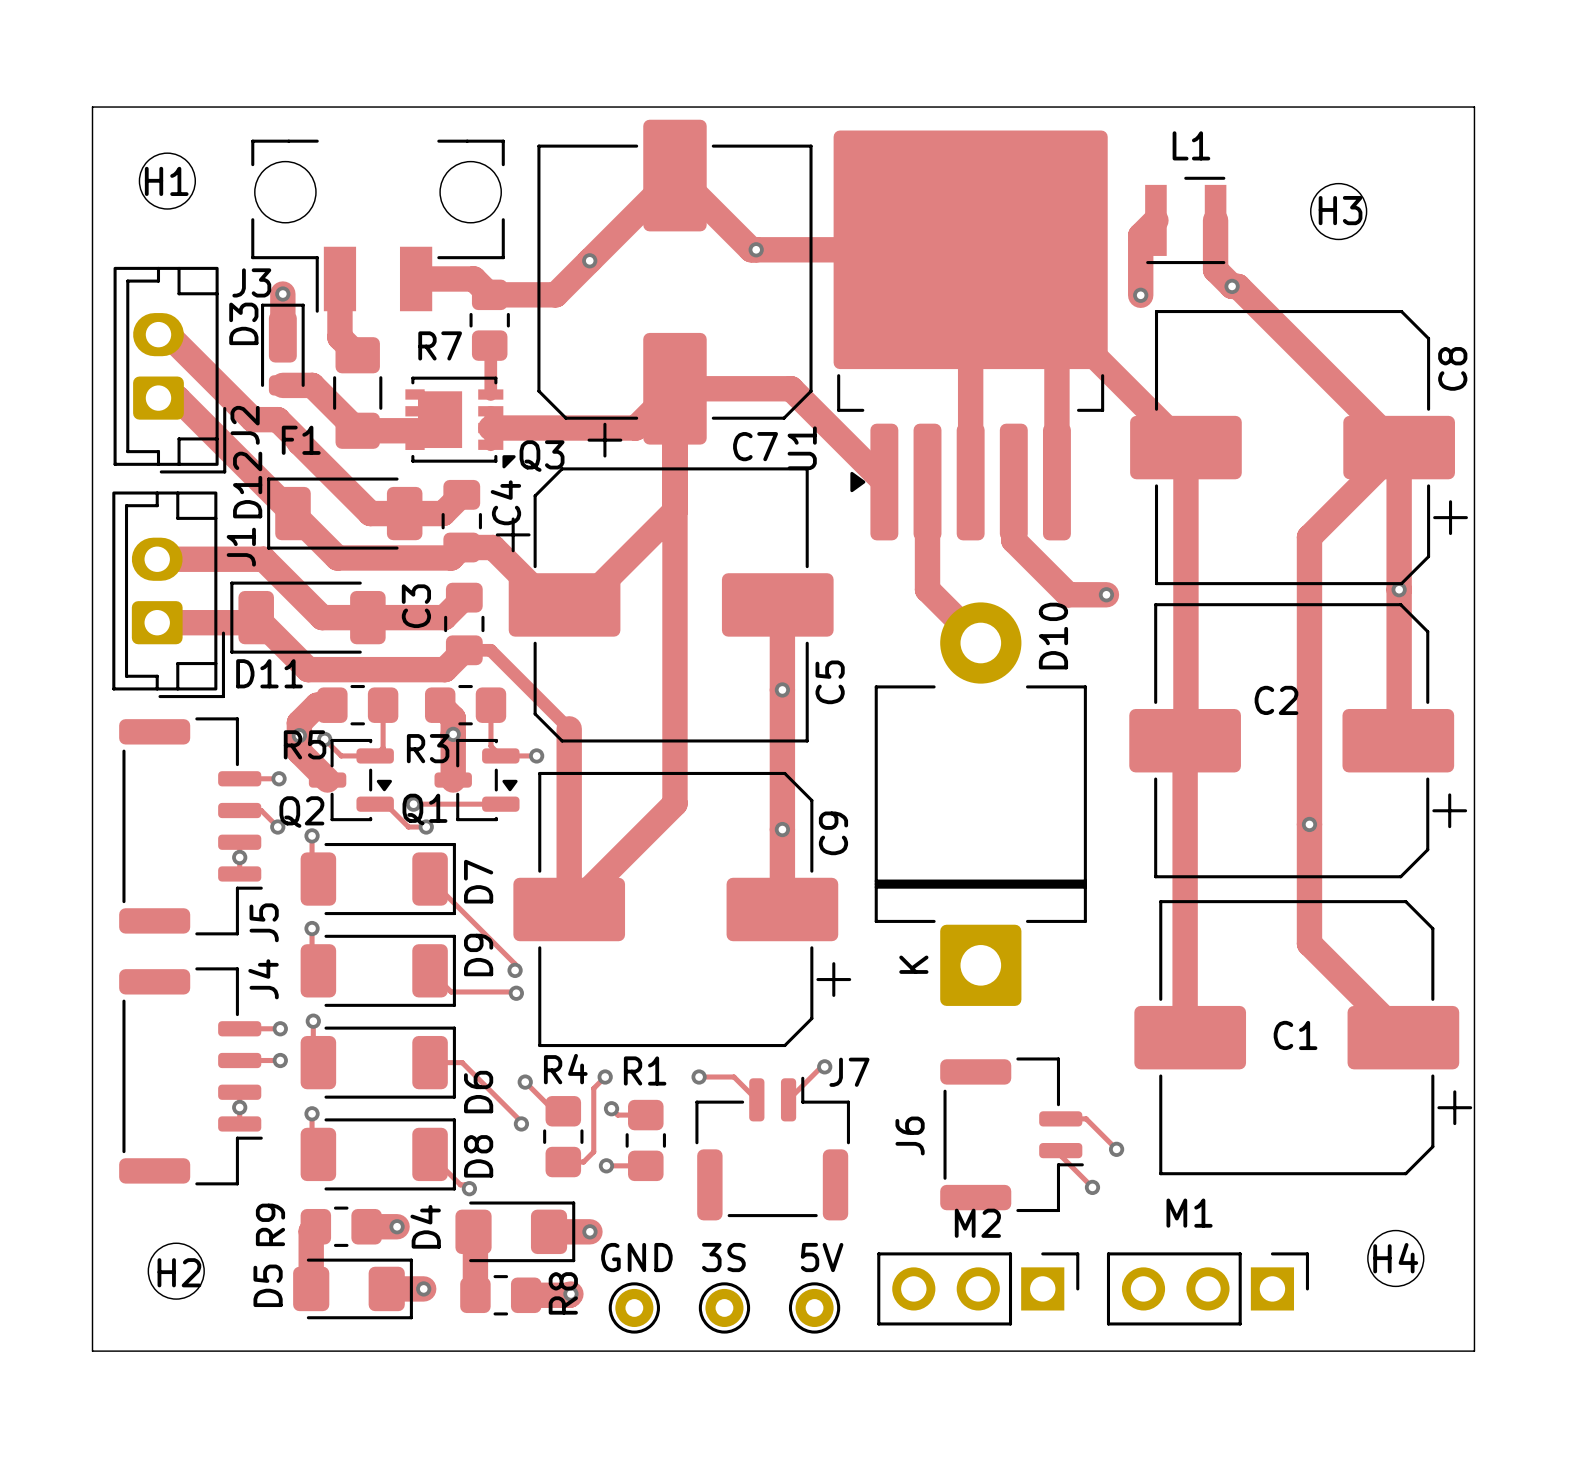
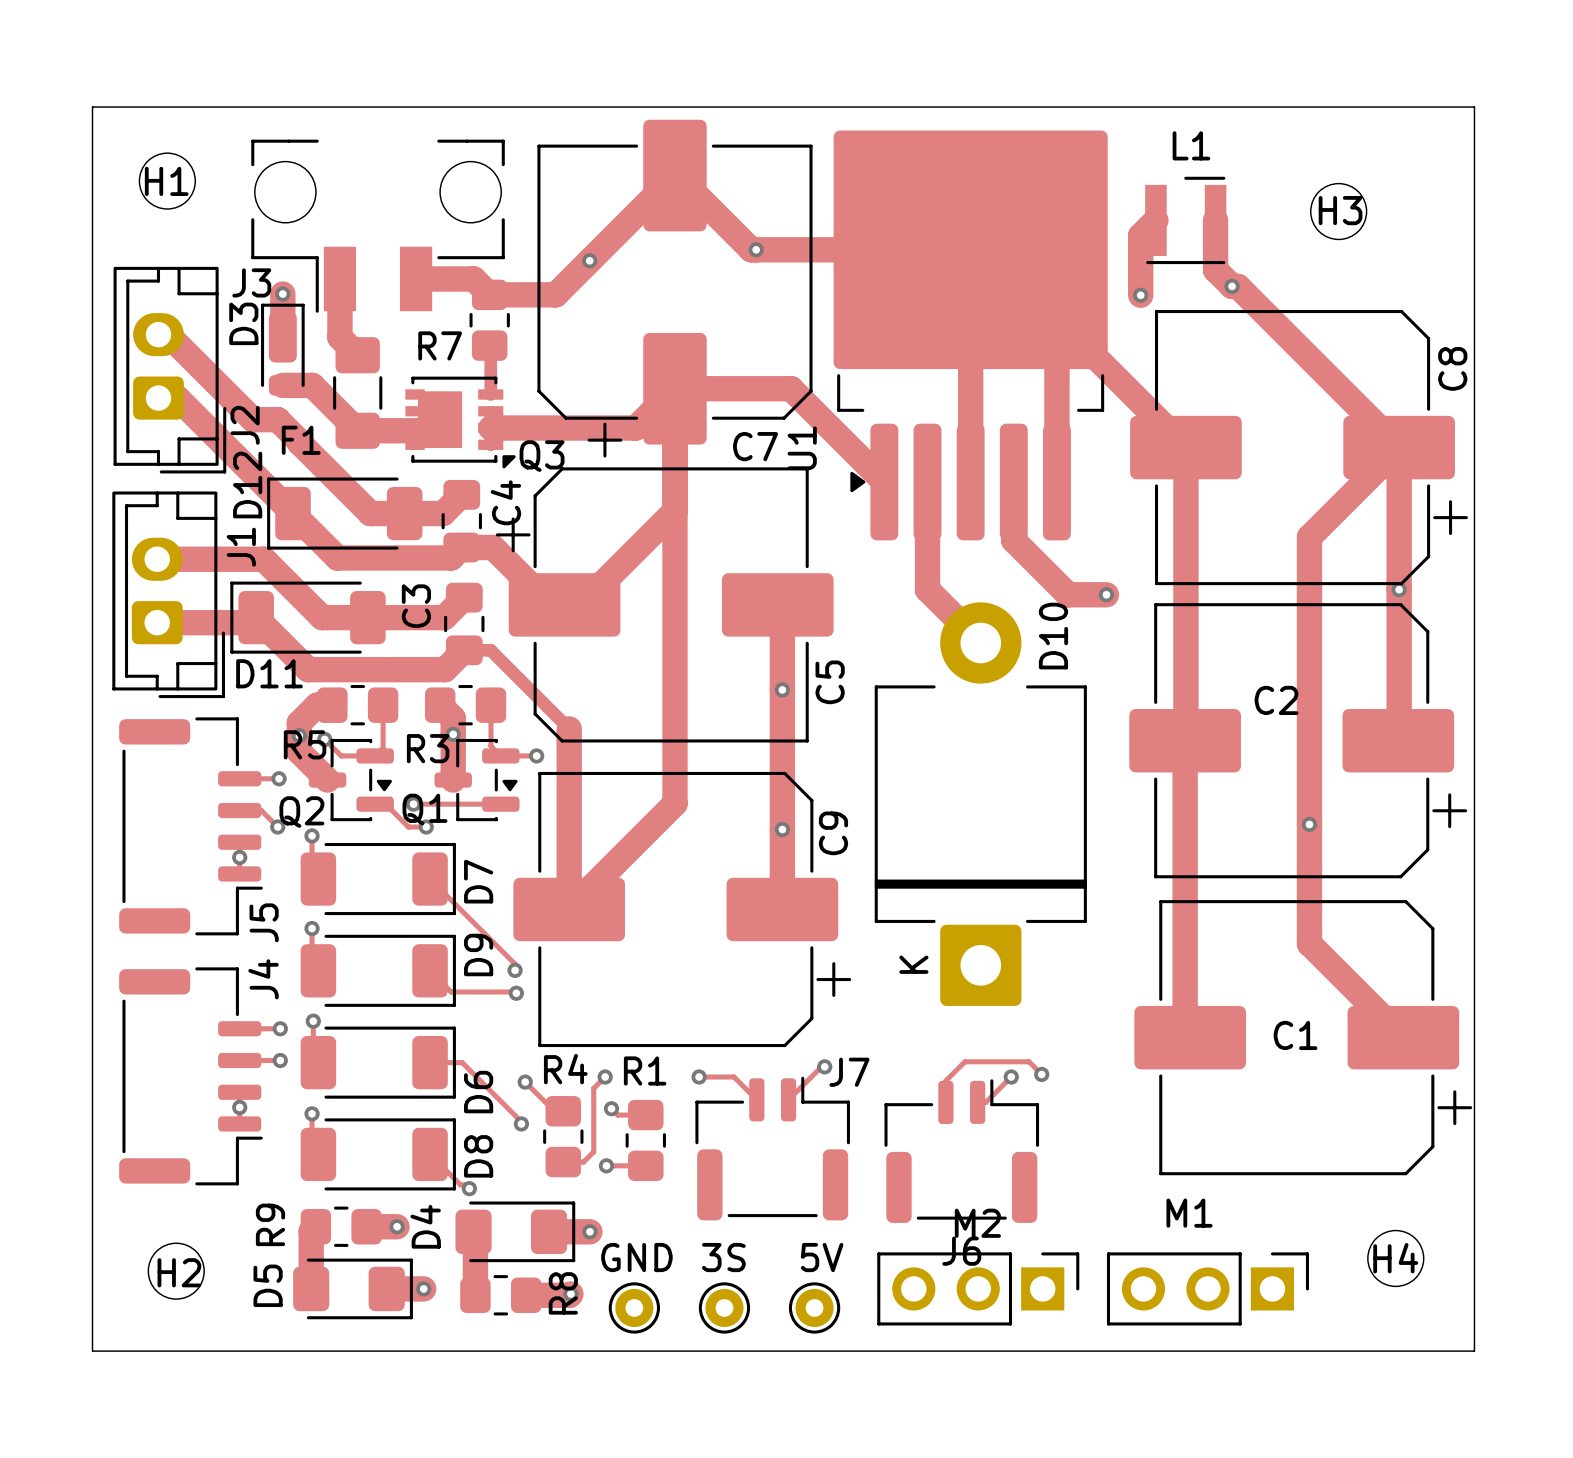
track: none -> (1041, 1074) (1029, 1061) (964, 1061) (945, 1080) (945, 1102)
via: none -> (1041, 1074)
track: none -> (1011, 1077) (985, 1102) (977, 1102)
via: none -> (1011, 1077)
track: (1060, 1118) (1086, 1118) (1116, 1149) -> none
J6 rotation: 0° (1012, 1134) -> 90° counterclockwise (961, 1151)
via: (1116, 1149) -> none
track: (1060, 1150) (1060, 1155) (1092, 1187) -> none
via: (1092, 1187) -> none

